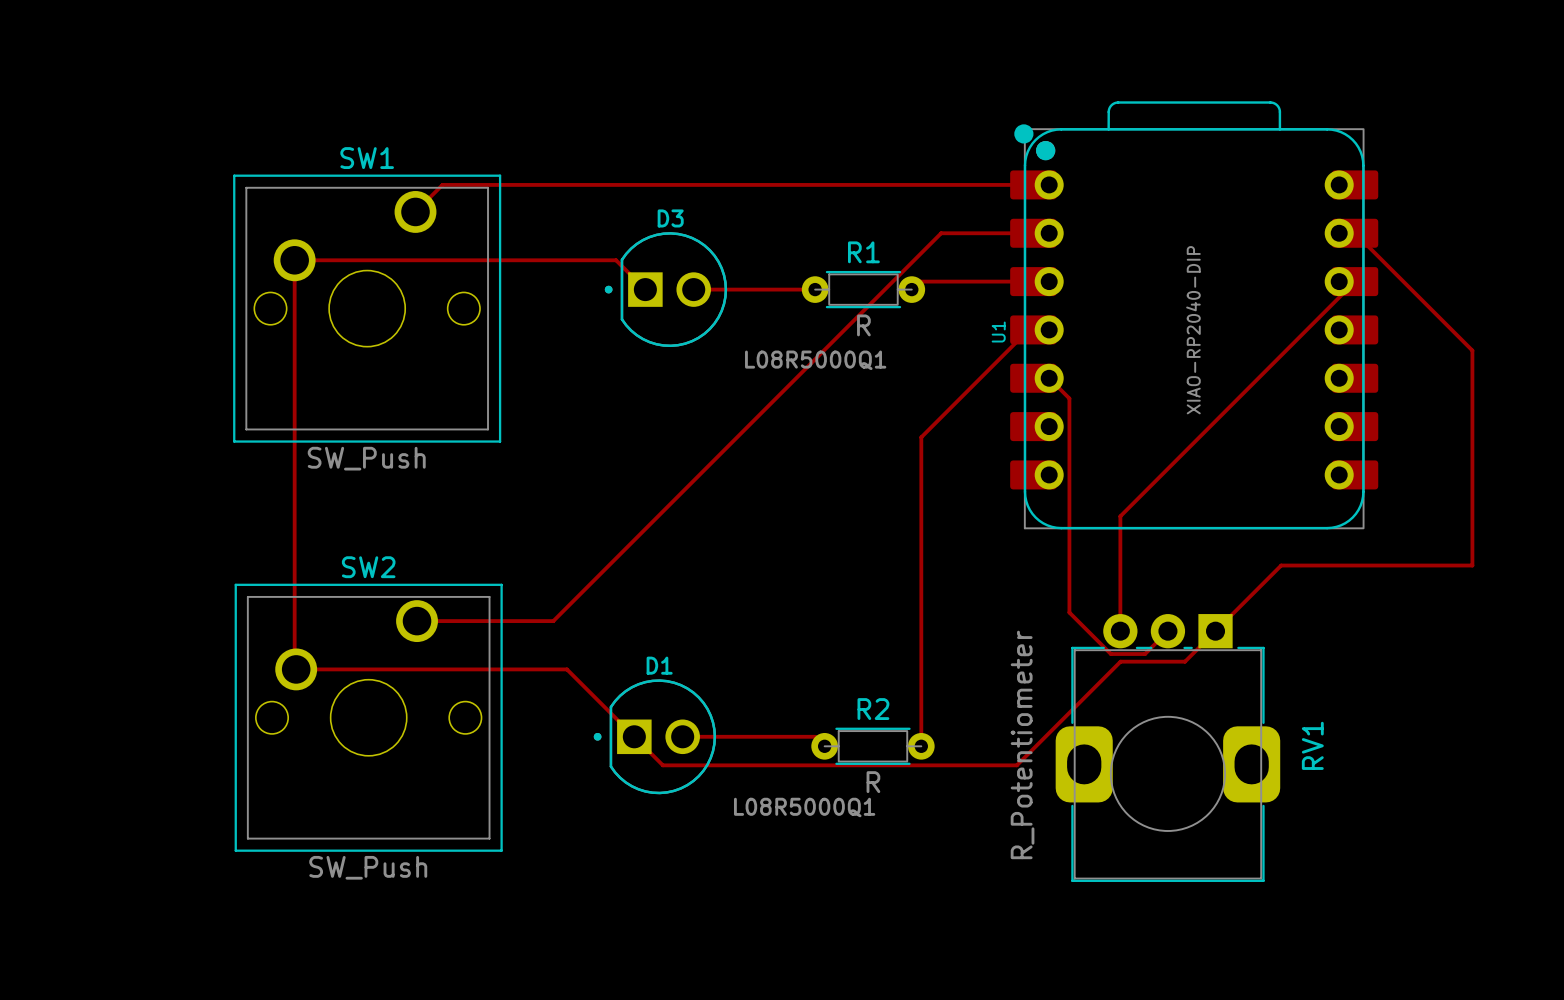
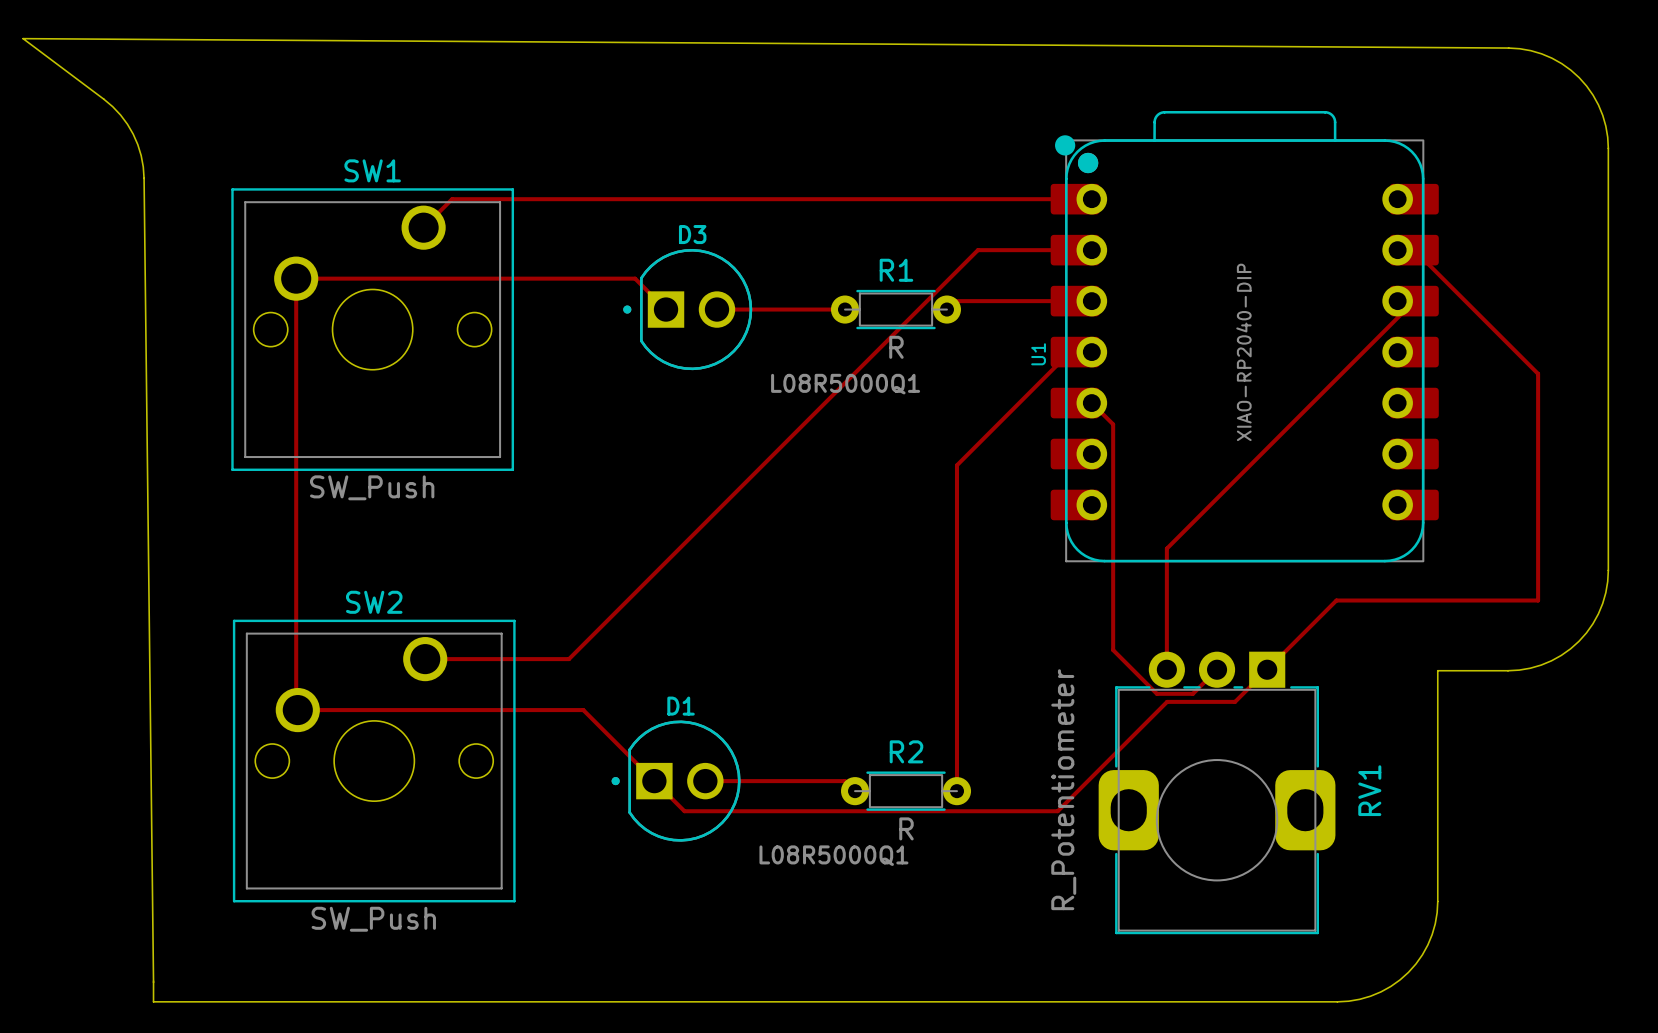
board edge: none -> (23, 38) (1508, 48) (1541, 53) (1561, 63) (1586, 86) (1602, 115) (1607, 137) (1608, 570) (1602, 603) (1592, 623) (1578, 641) (1561, 655) (1541, 665) (1508, 670) (1437, 670) (1437, 901) (1435, 923) (1427, 945) (1408, 972) (1390, 986) (1359, 999) (1337, 1001) (153, 1001) (143, 166) (133, 134) (120, 115) (103, 99) (23, 38)

